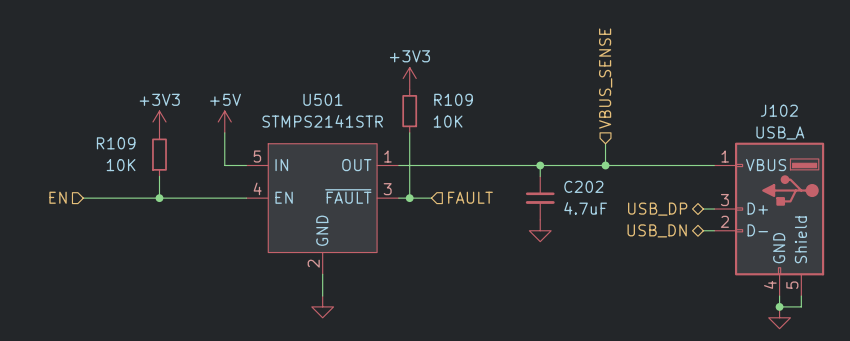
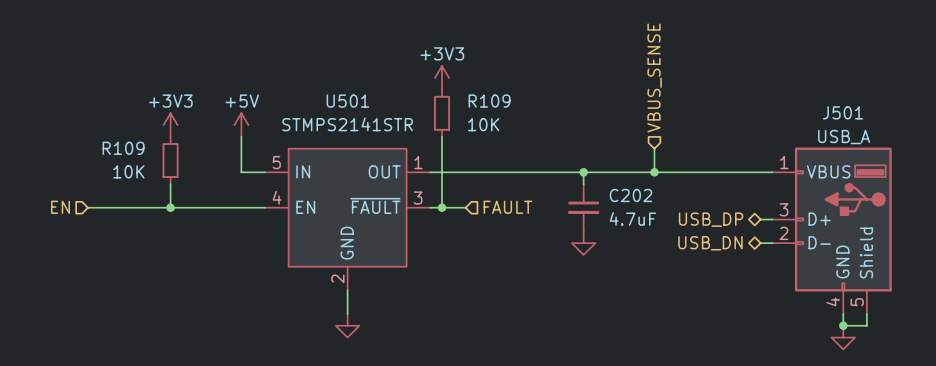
J102 name: J102 (779, 110) -> J501 (843, 112)

